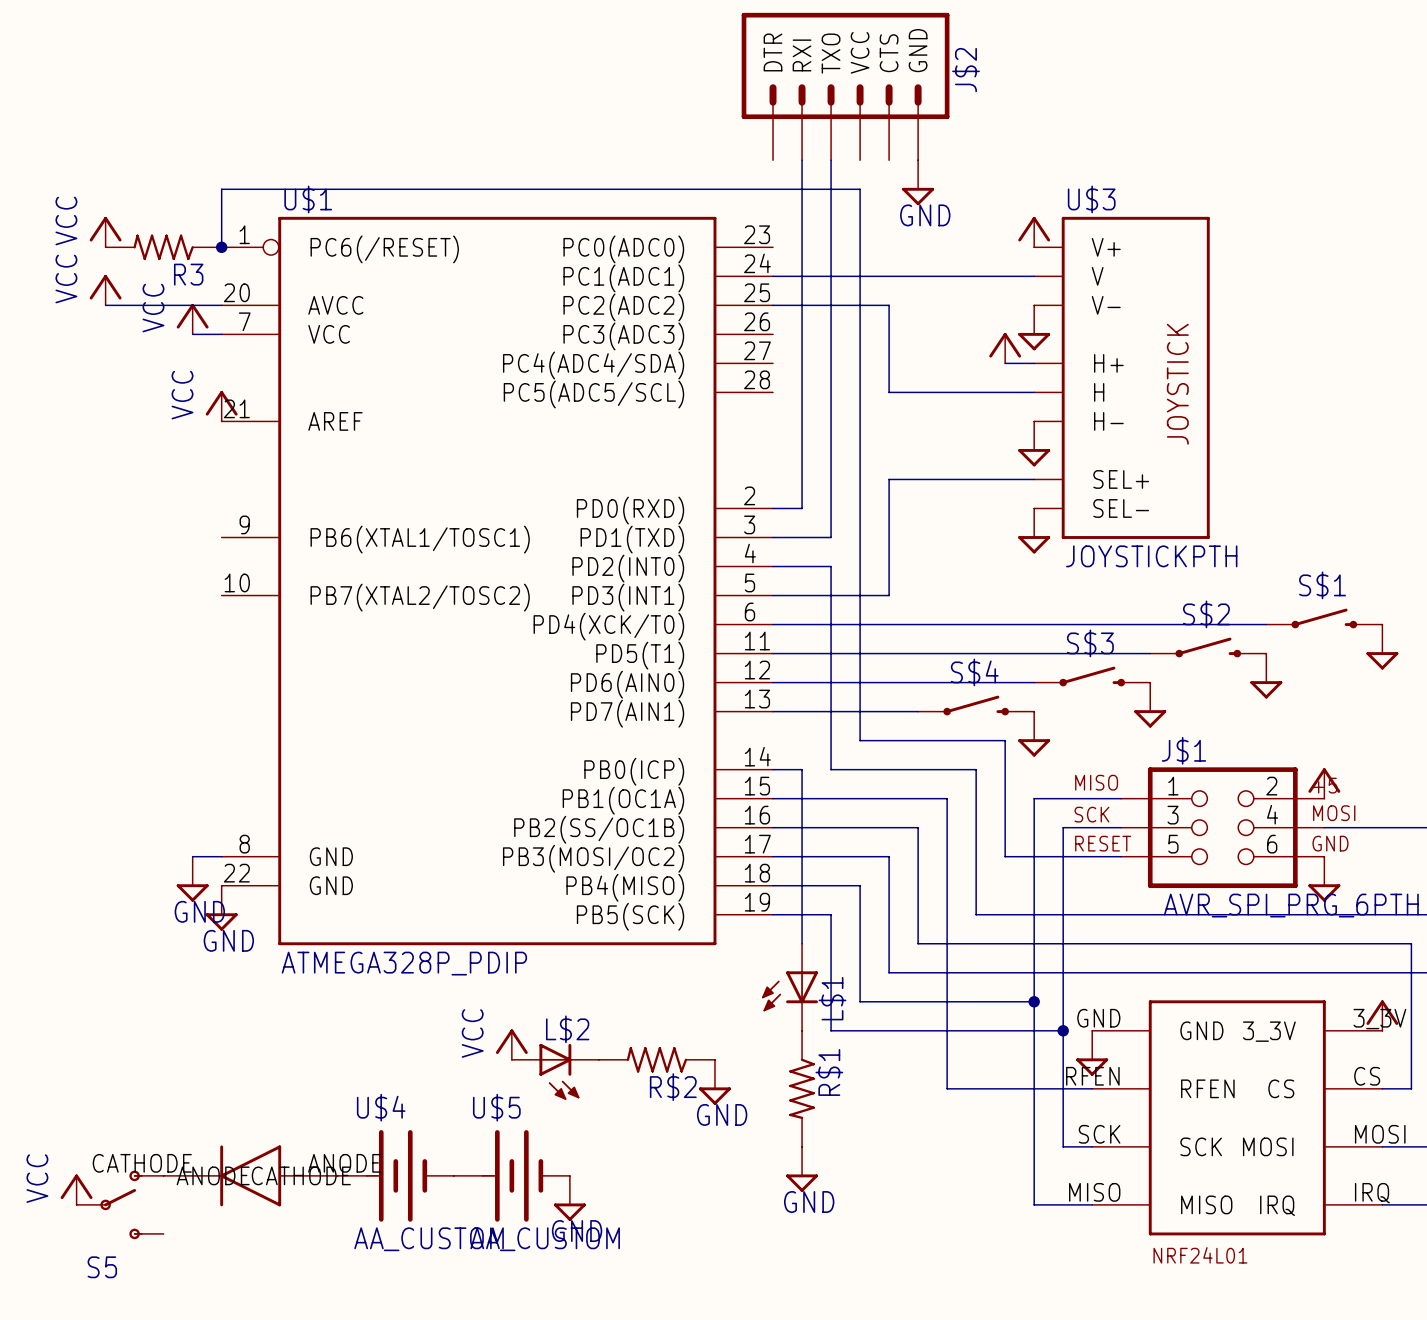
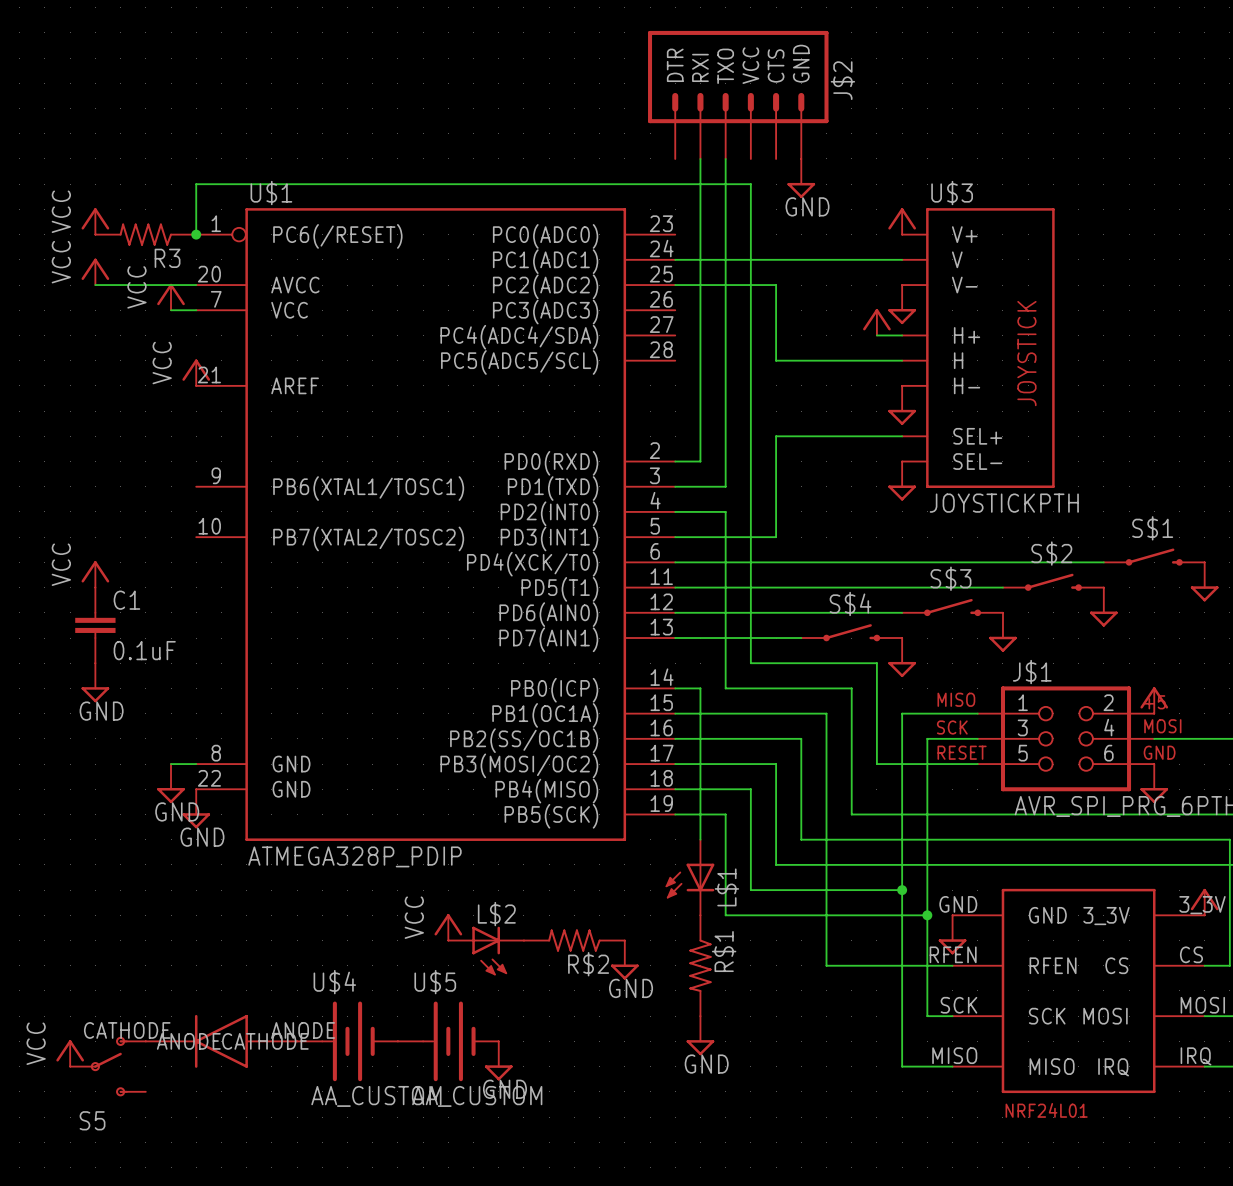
power symbol: none -> VCC (95, 574)
C1: none -> 0.1uF (95, 625)
power symbol: none -> GND (95, 682)

